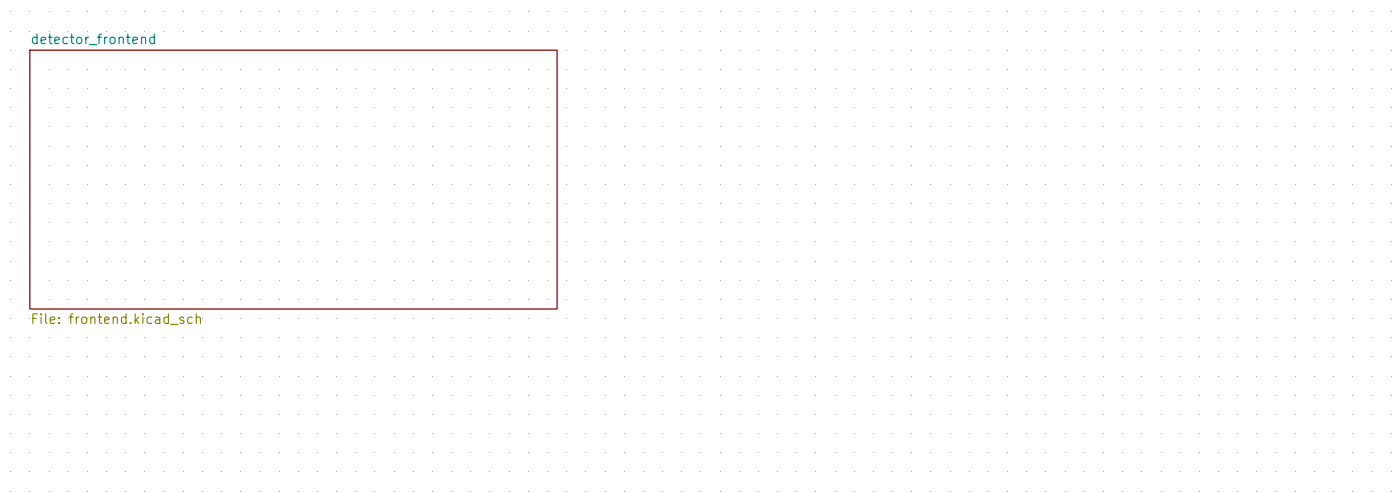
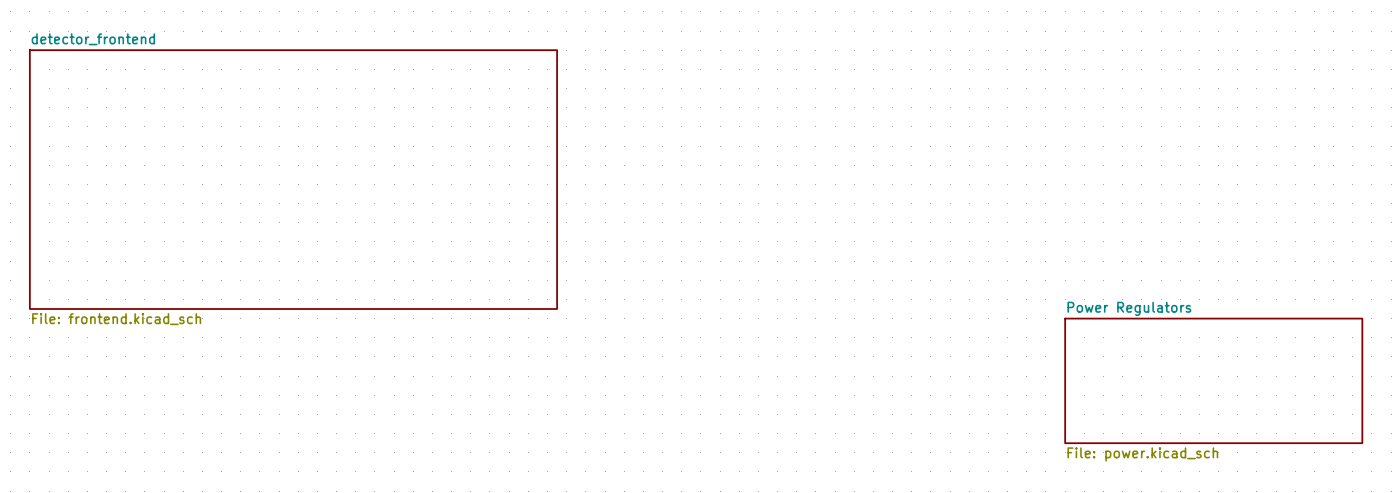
sheet Power Regulators: none -> File: power.kicad_sch (1213, 380)

